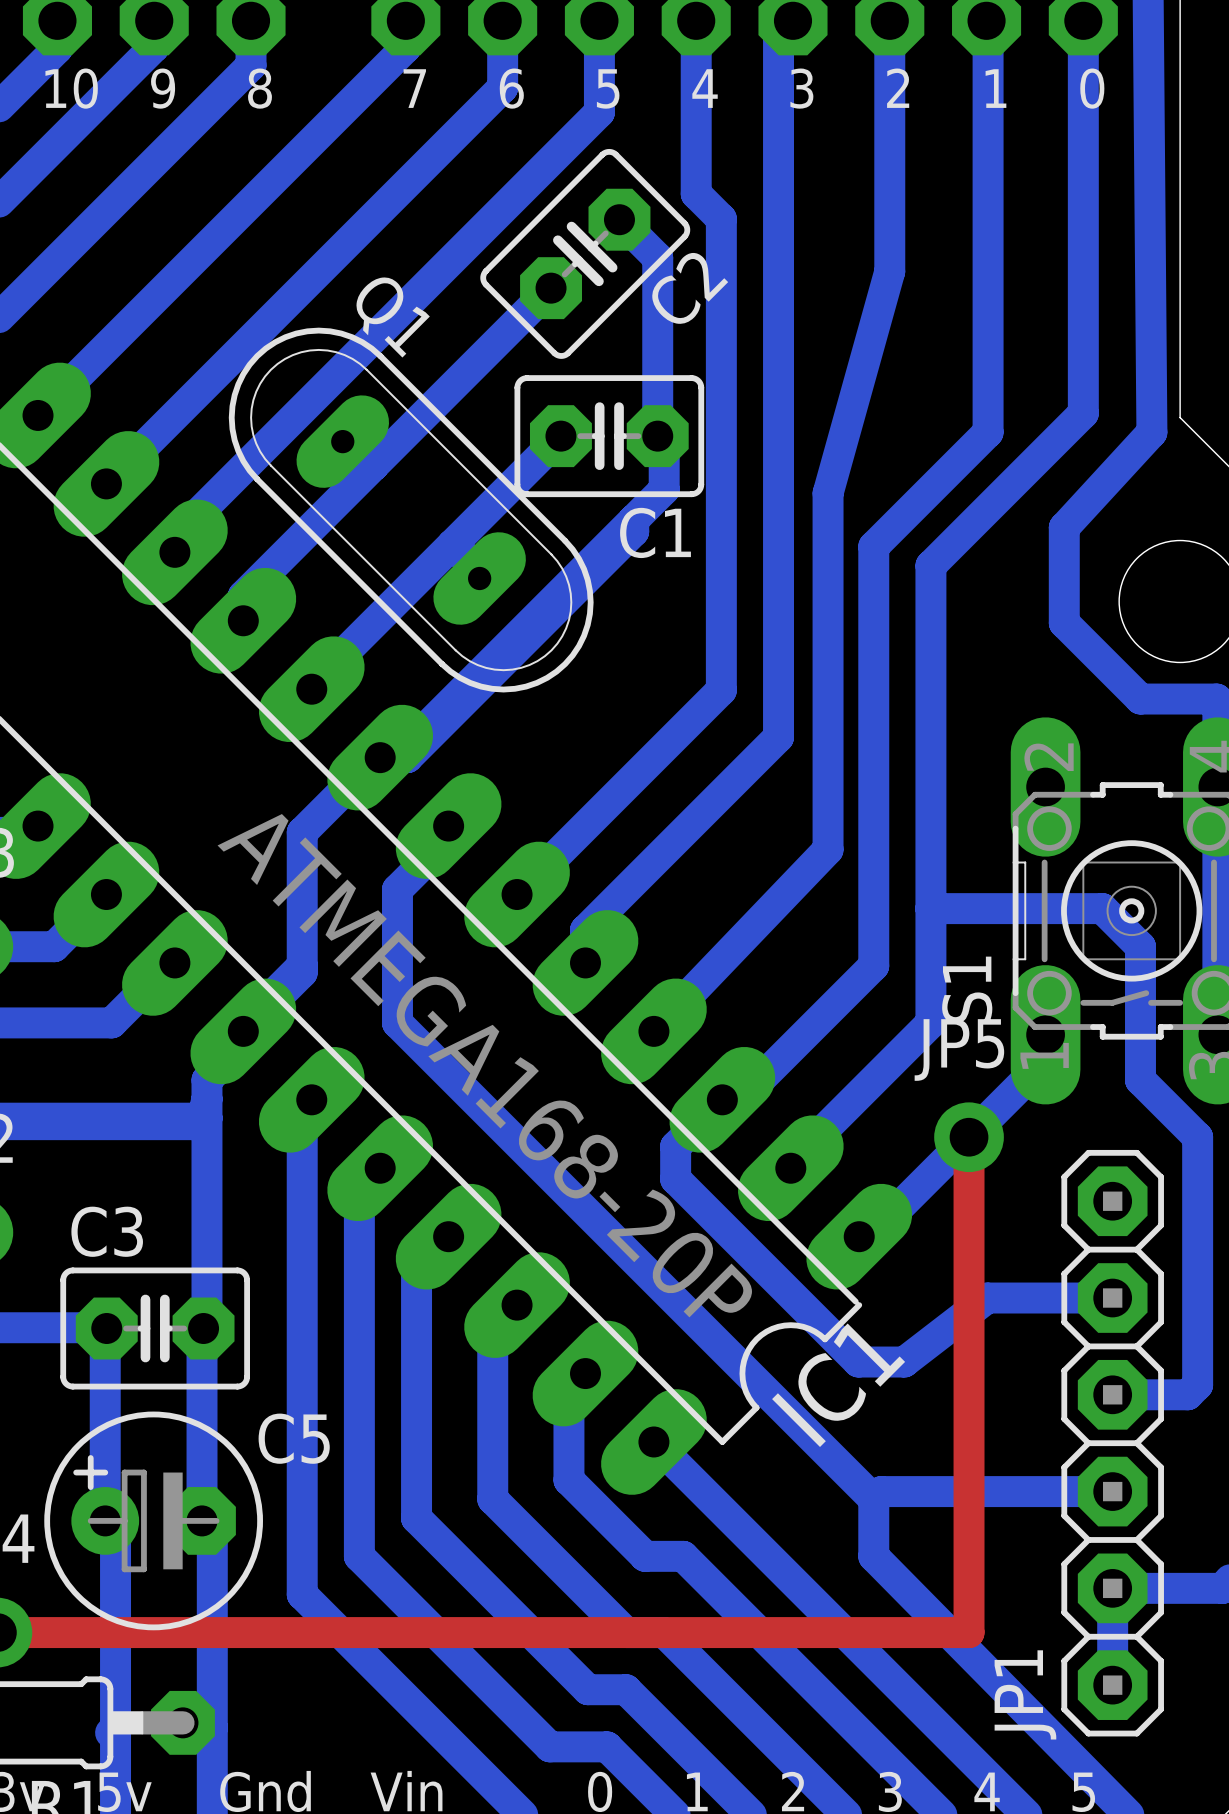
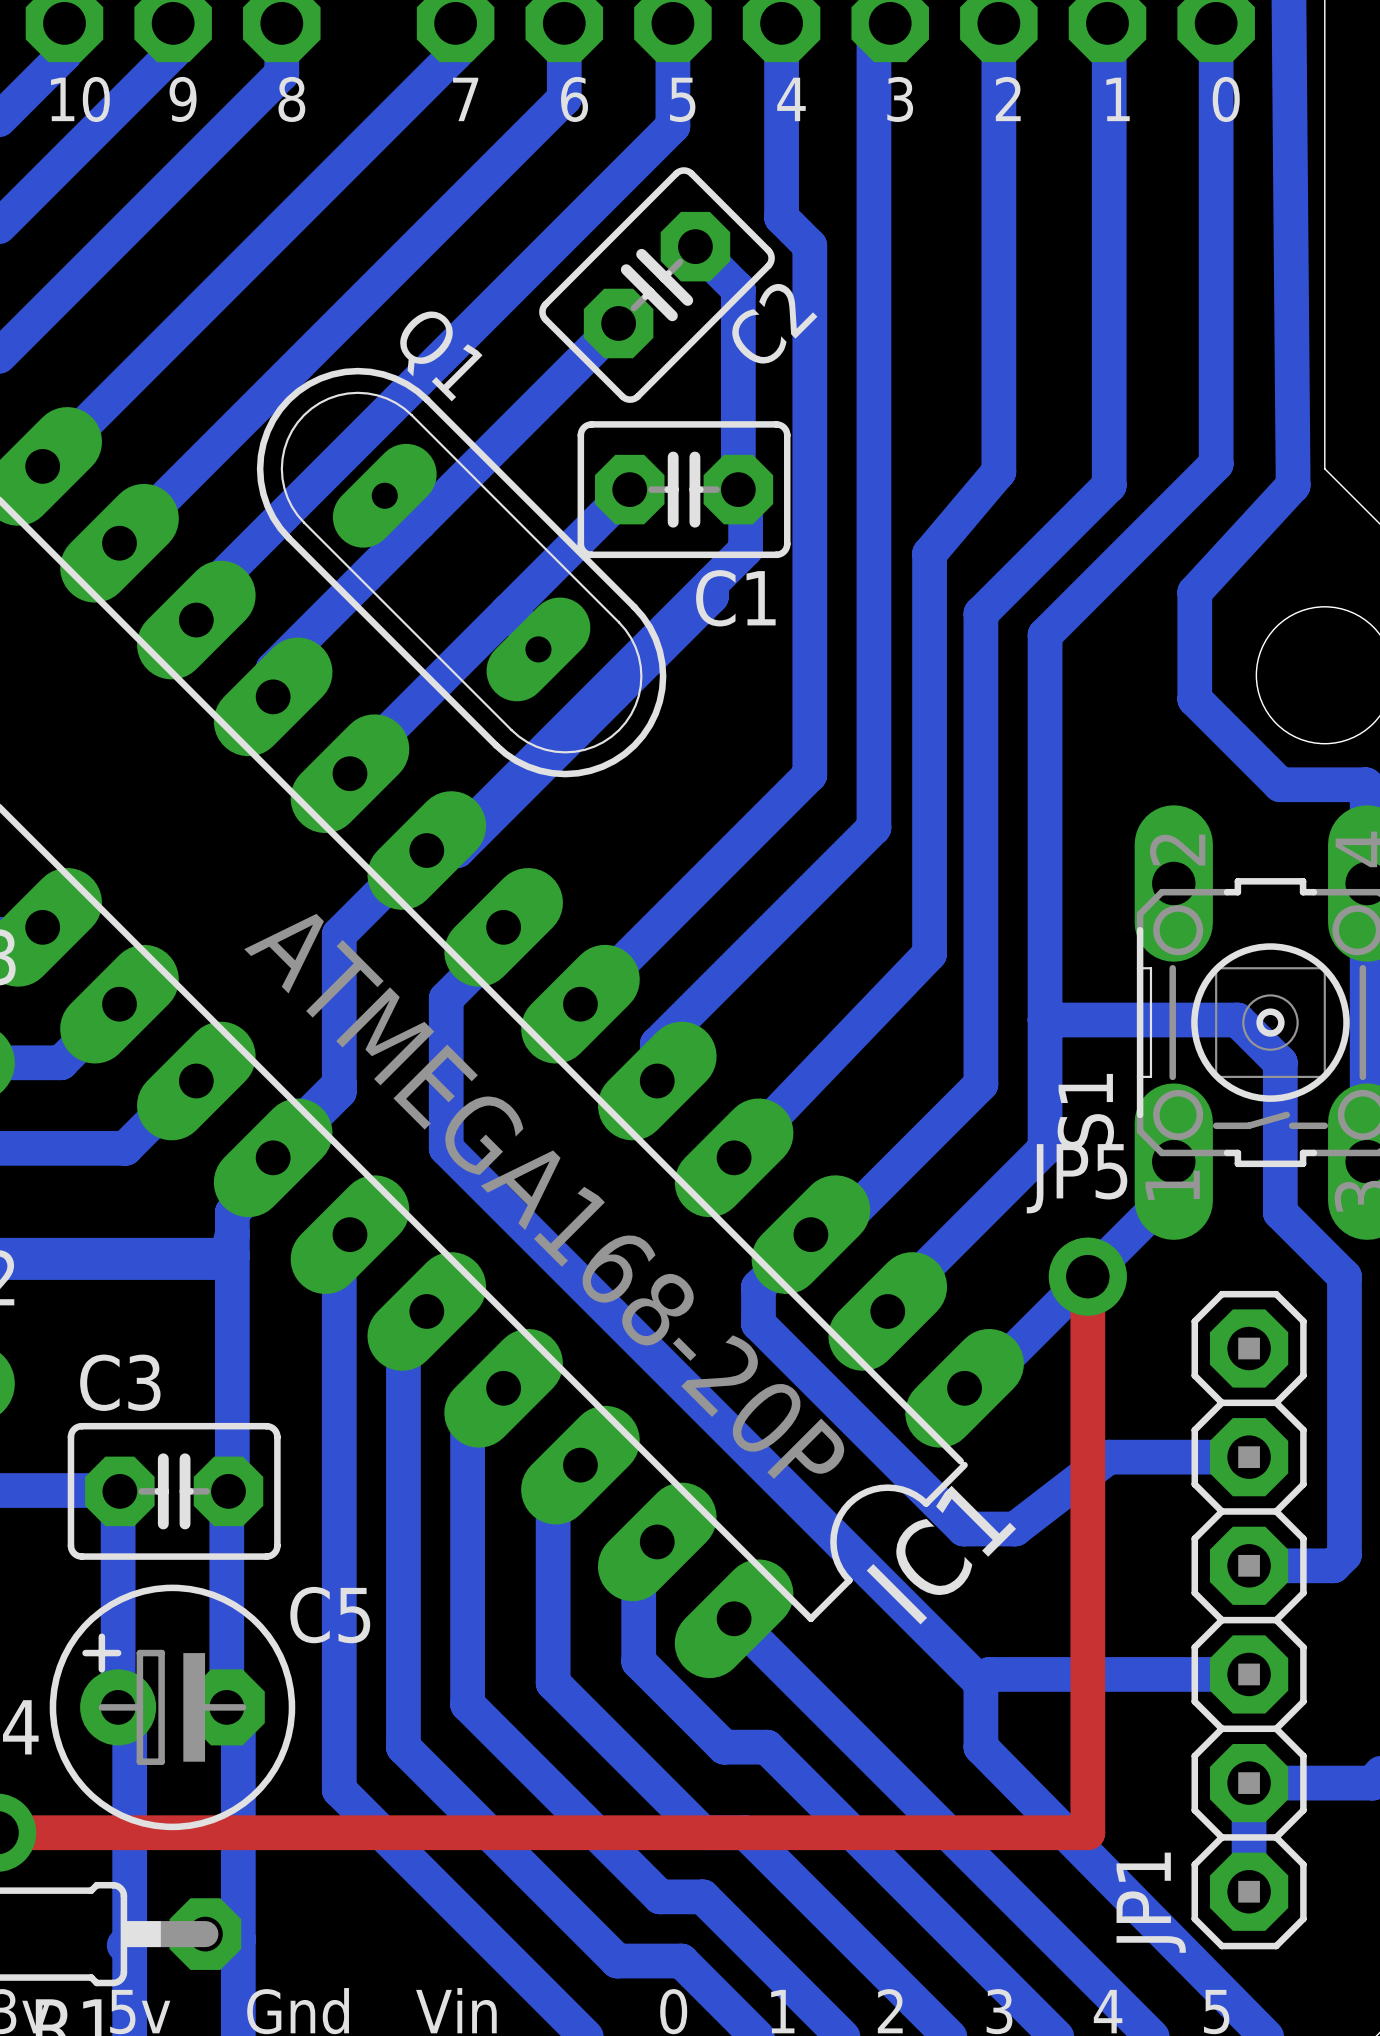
bottom track: (889, 271) (828, 493) -> (998, 304) (998, 471) (929, 553)

